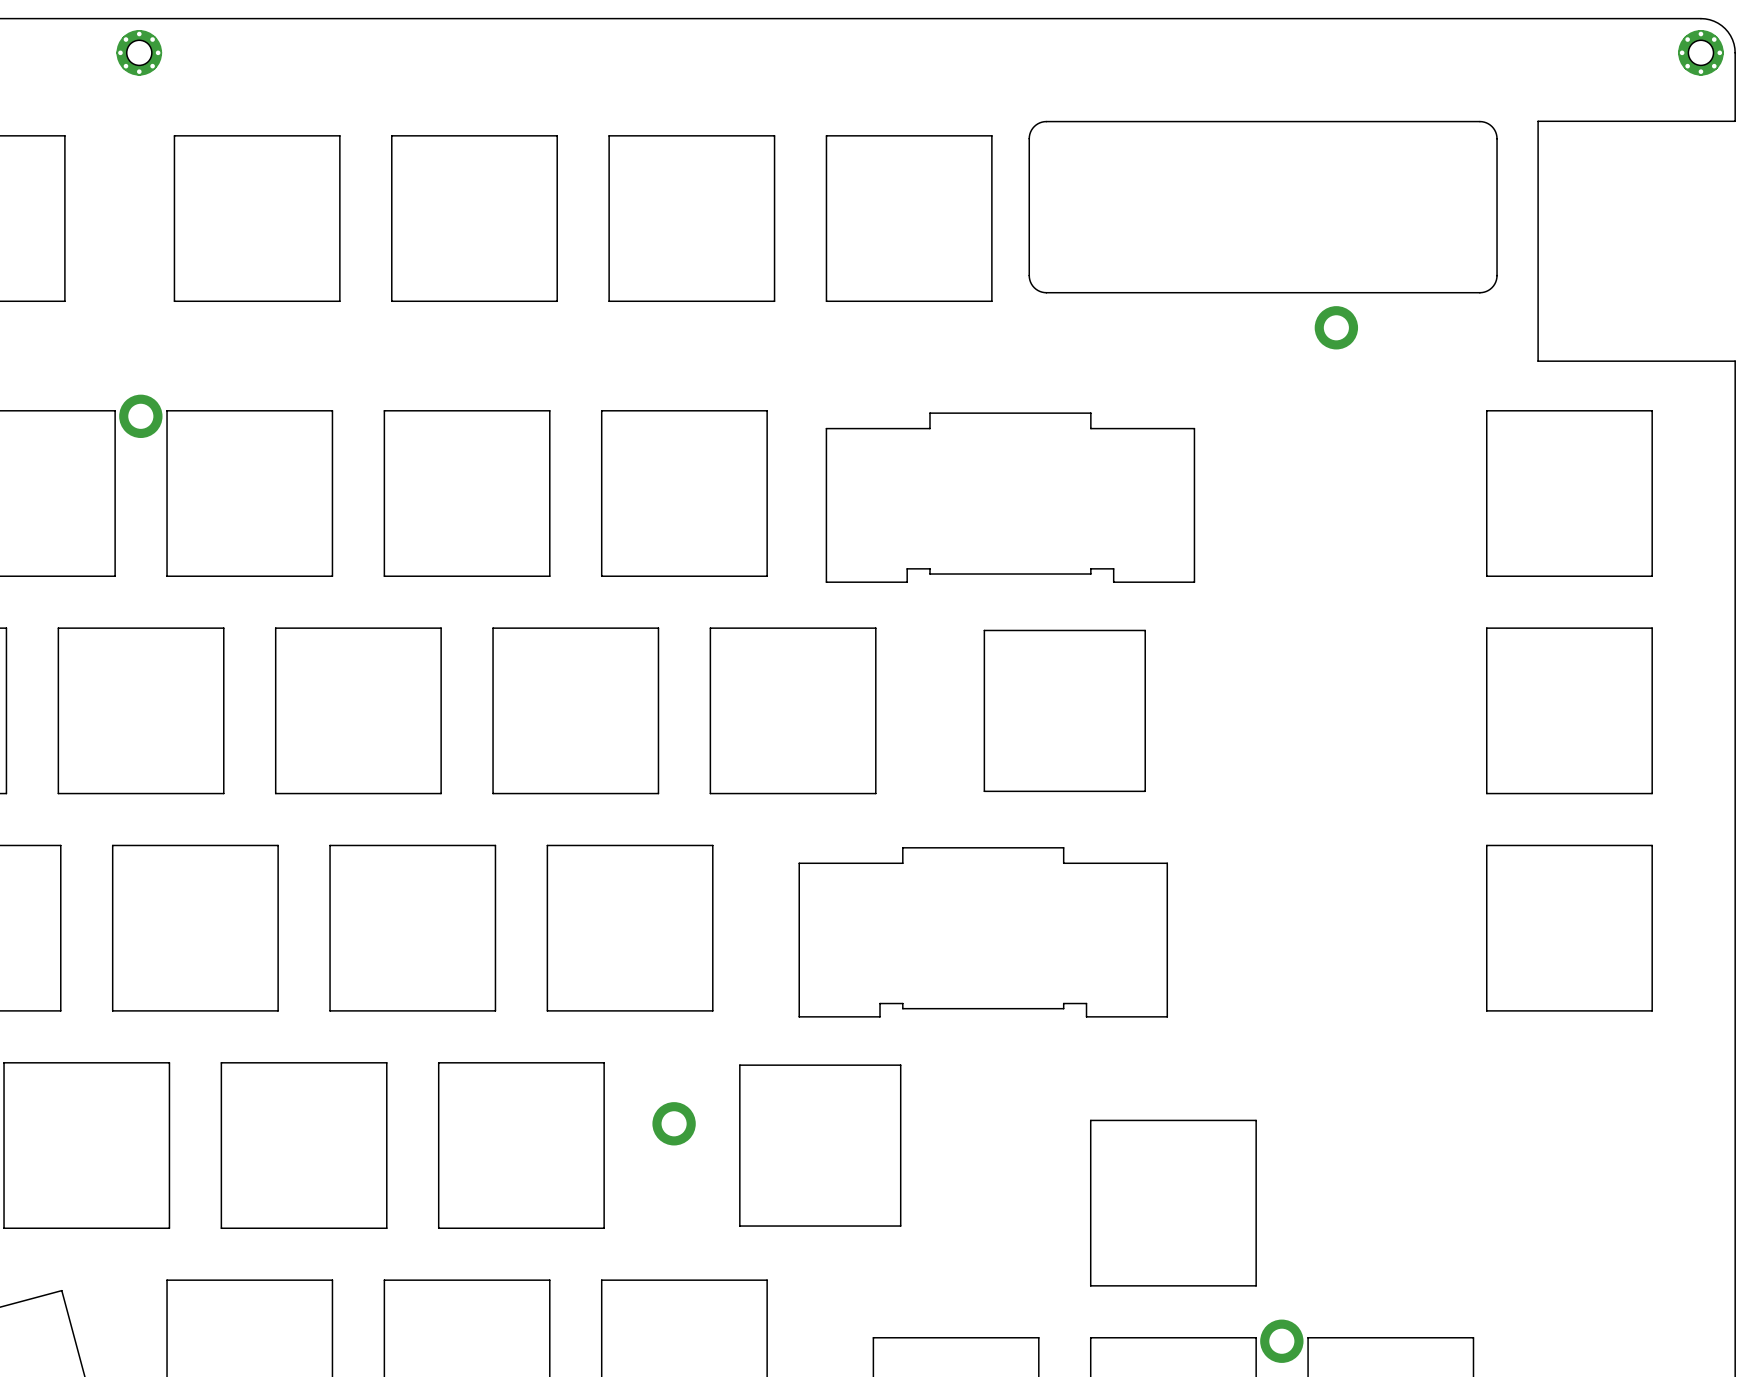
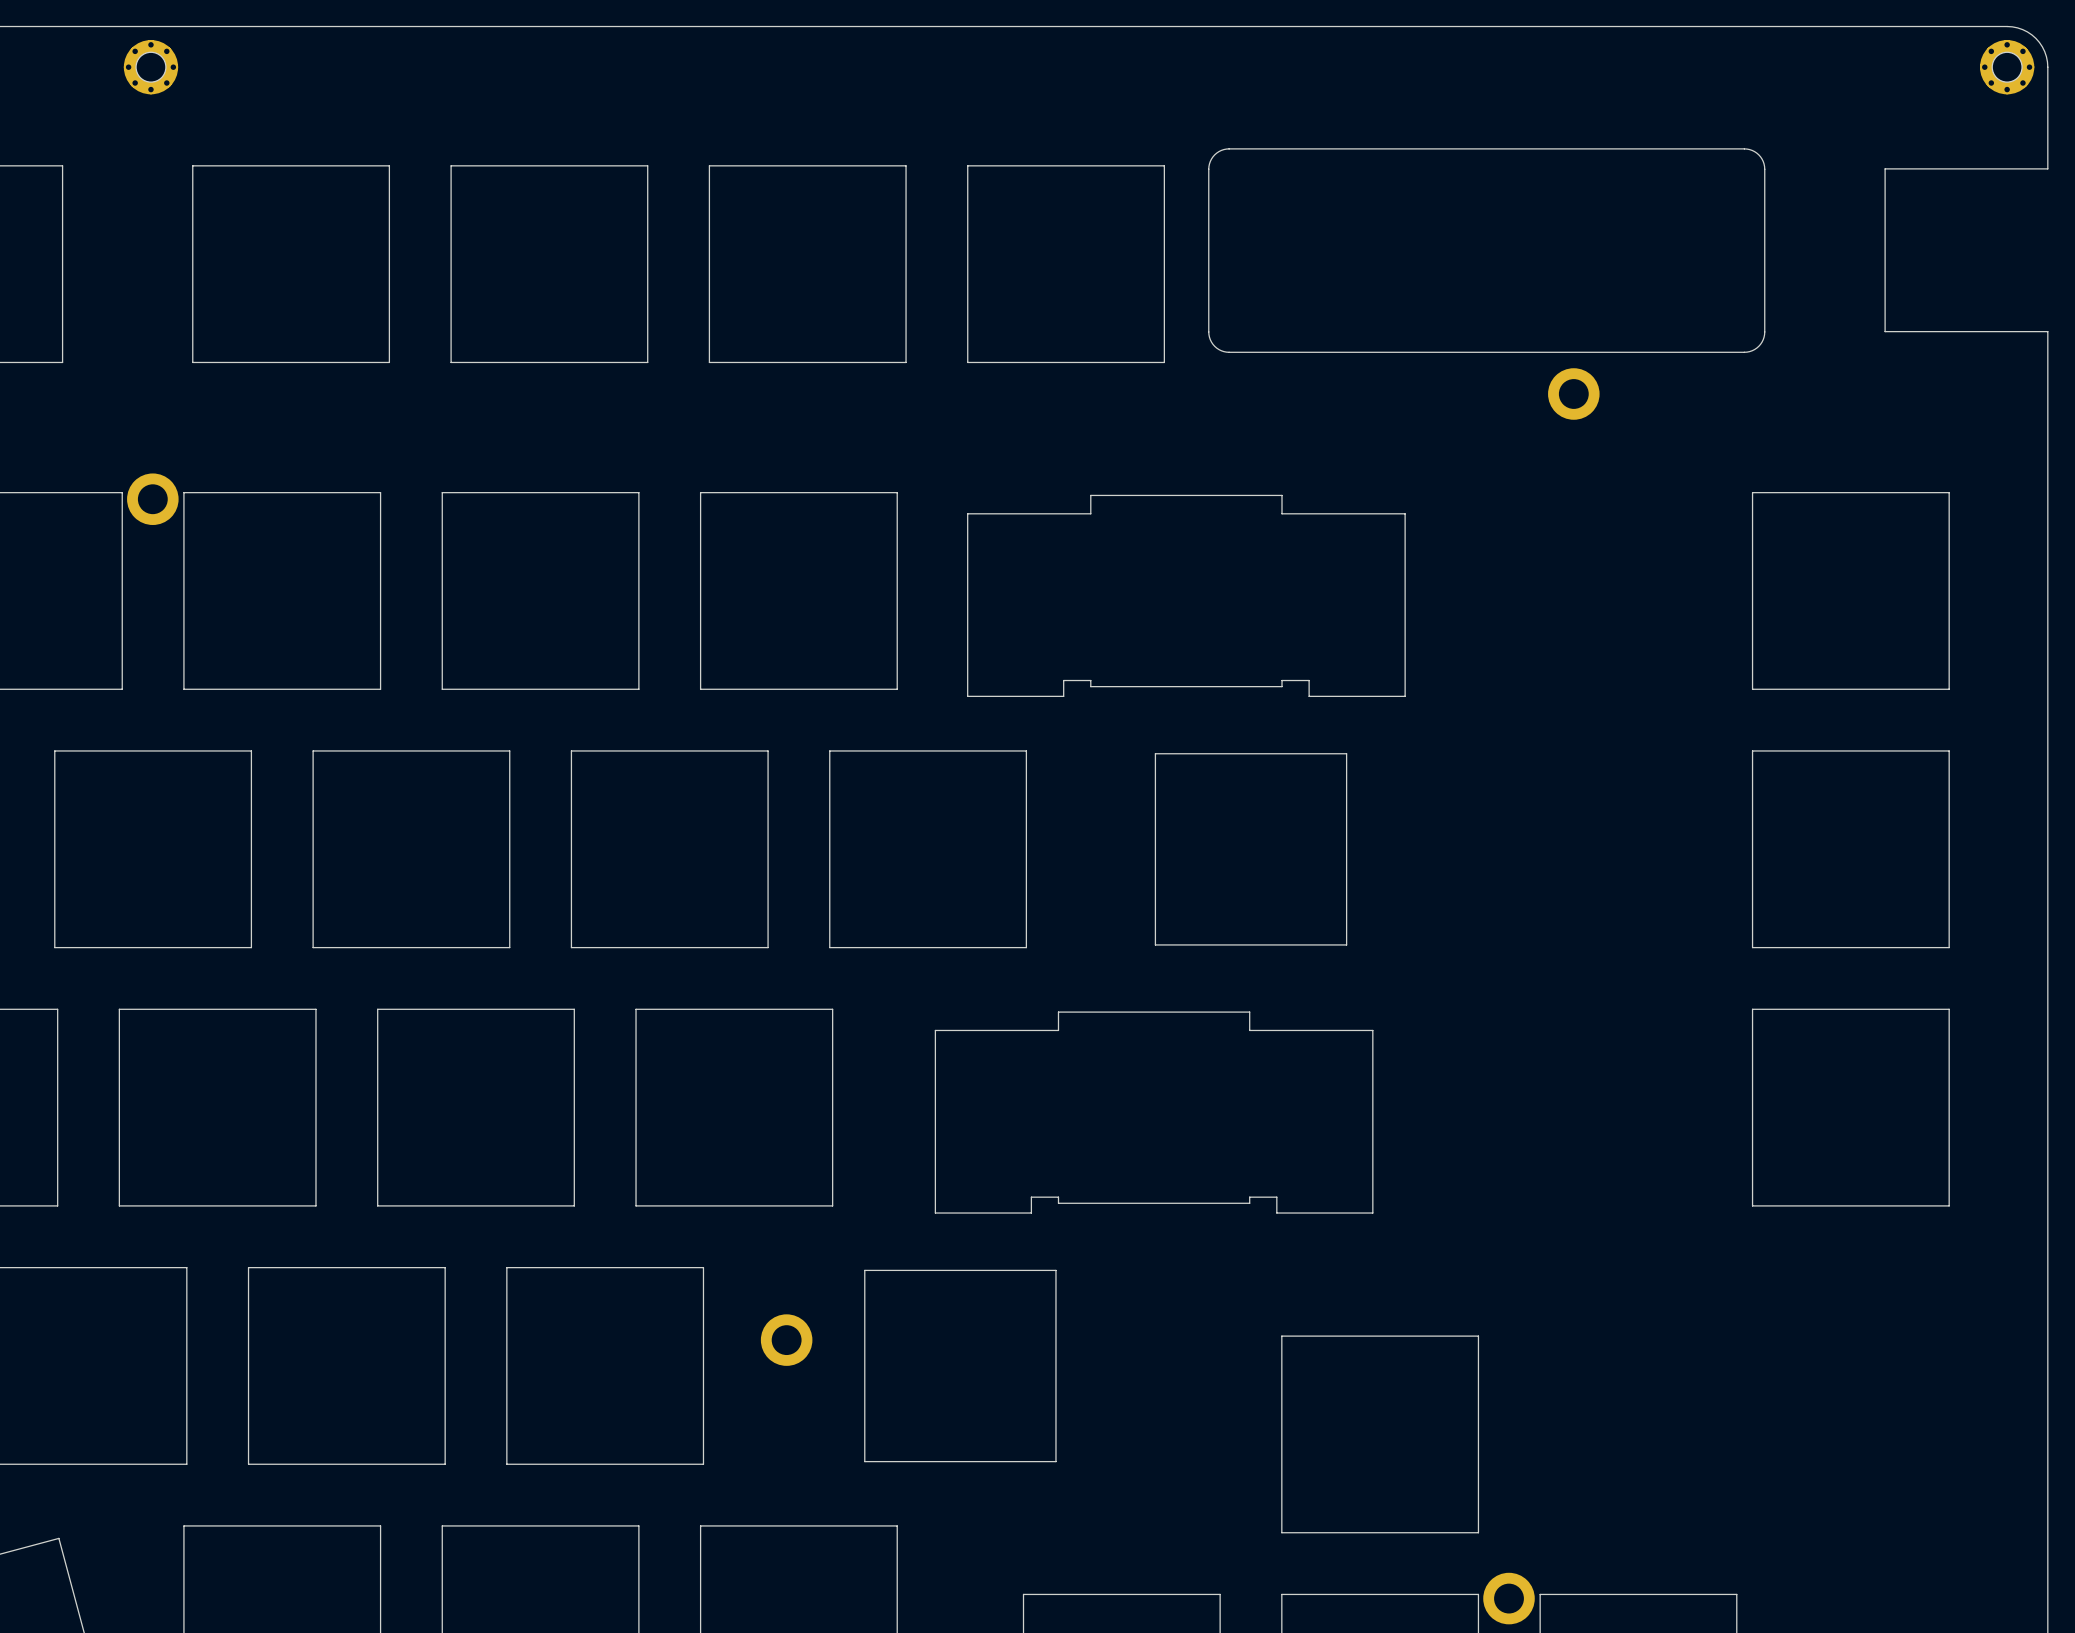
board edge: (1735, 121) (1538, 121) (1538, 361) (1735, 361) -> (2047, 148) (2047, 168) (1885, 168) (1885, 331) (2047, 331) (2047, 433)

